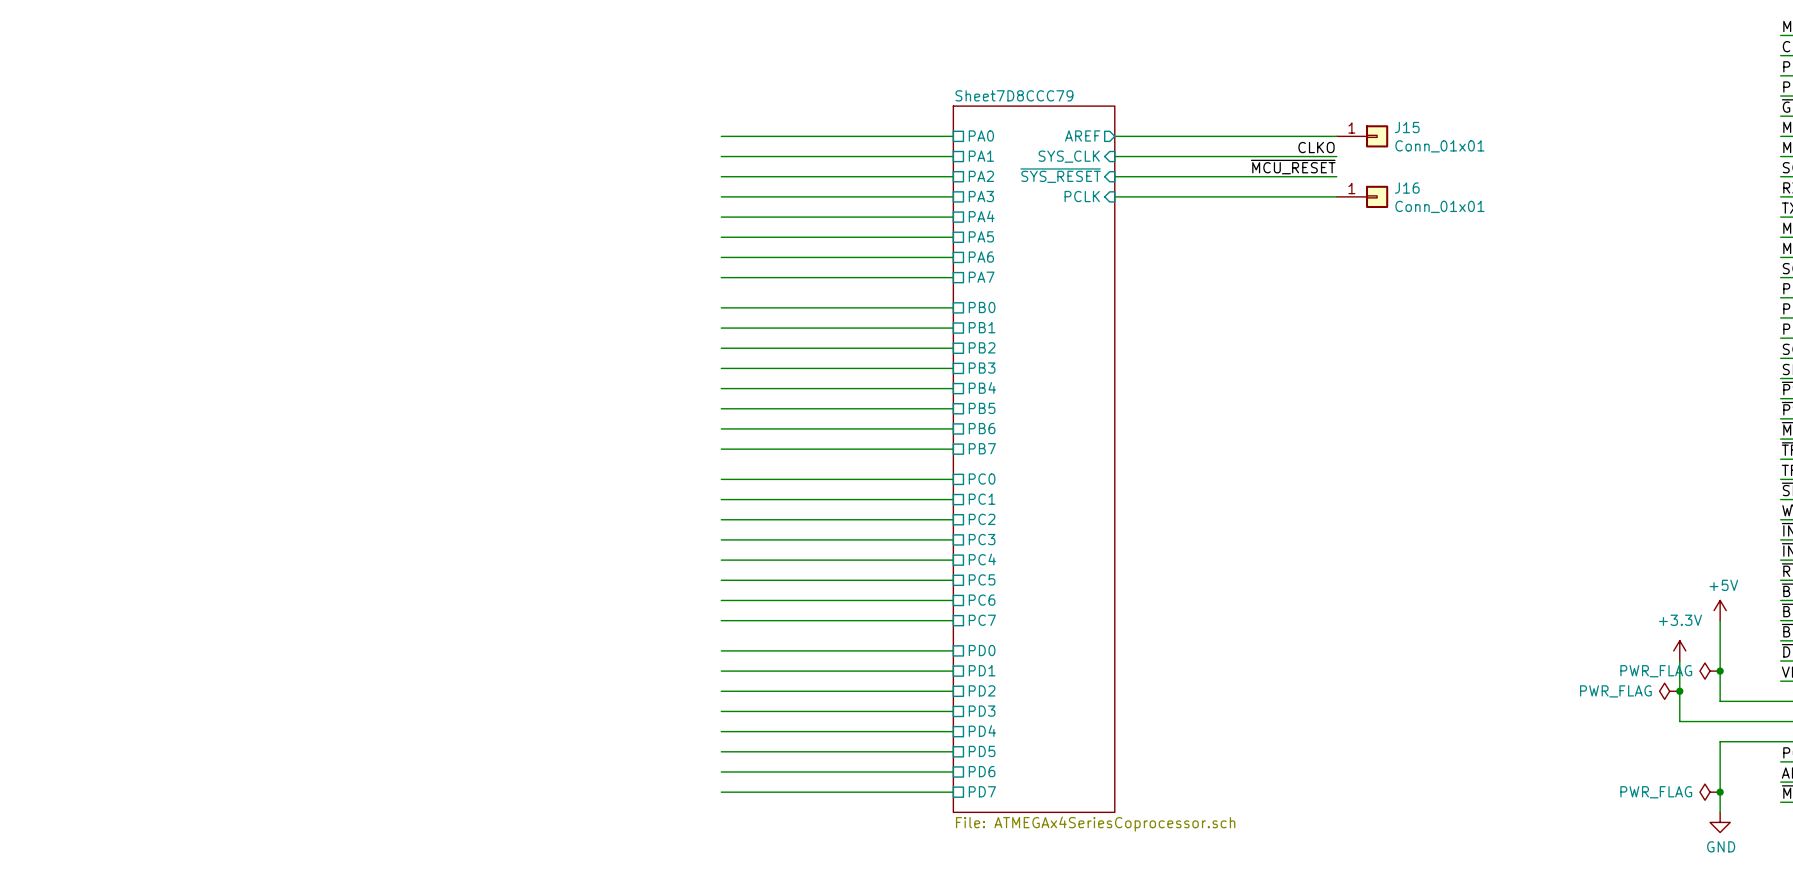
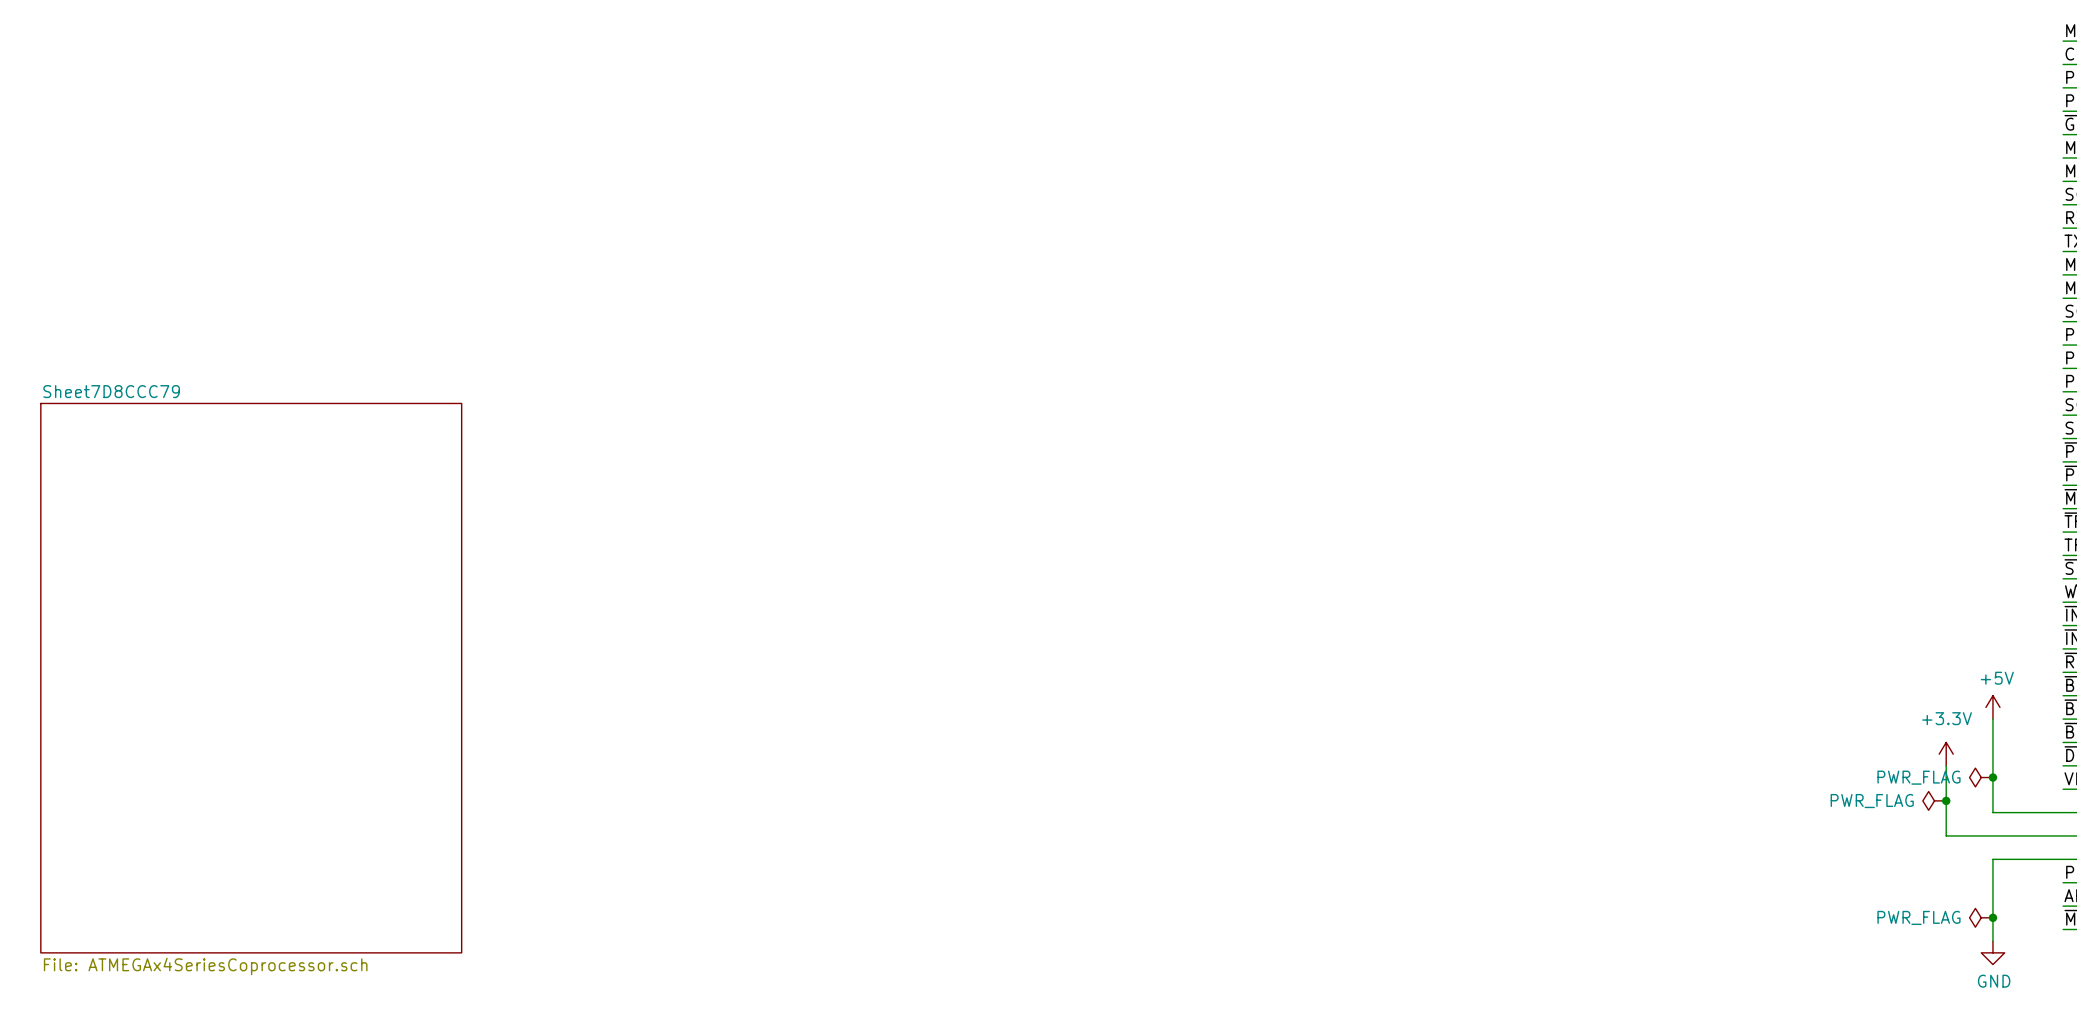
sheet Sheet7D8CCC79 name position: Sheet7D8CCC79 (1014, 95) -> Sheet7D8CCC79 (111, 391)
sheet Sheet7D8CCC79 shape: [953, 106, 1115, 813] -> [40, 403, 462, 953]
sheet pin: PA0 (981, 135) -> none
sheet pin: AREF (1082, 135) -> none
wire: (721, 136) (953, 136) -> none
wire: (1114, 136) (1336, 136) -> none
J15: Conn_01x01 (1362, 136) -> none
label: CLKO (1316, 147) -> none
wire: (721, 156) (953, 156) -> none
sheet pin: PA1 (981, 156) -> none
sheet pin: SYS_CLK (1069, 156) -> none
wire: (1114, 156) (1336, 156) -> none
label: ~{MCU_RESET} (1293, 167) -> none
sheet pin: ~{SYS_RESET} (1060, 175) -> none
wire: (721, 176) (953, 176) -> none
sheet pin: PA2 (981, 176) -> none
wire: (1114, 176) (1336, 176) -> none
wire: (721, 196) (953, 196) -> none
sheet pin: PA3 (981, 196) -> none
sheet pin: PCLK (1082, 196) -> none
wire: (1114, 196) (1336, 196) -> none
J16: Conn_01x01 (1362, 196) -> none
sheet pin: PA4 (981, 216) -> none
wire: (721, 217) (953, 217) -> none
sheet pin: PA5 (981, 236) -> none
wire: (721, 237) (953, 237) -> none
wire: (721, 257) (953, 257) -> none
sheet pin: PA6 (981, 257) -> none
wire: (721, 277) (953, 277) -> none
sheet pin: PA7 (981, 277) -> none
wire: (721, 307) (953, 307) -> none
sheet pin: PB0 (982, 307) -> none
sheet pin: PB1 (982, 327) -> none
wire: (721, 328) (953, 328) -> none
sheet pin: PB2 (982, 347) -> none
wire: (721, 348) (953, 348) -> none
wire: (721, 368) (953, 368) -> none
sheet pin: PB3 (982, 368) -> none
sheet pin: PB4 (982, 387) -> none
wire: (721, 388) (953, 388) -> none
wire: (721, 408) (953, 408) -> none
sheet pin: PB5 (982, 408) -> none
wire: (721, 428) (953, 428) -> none
sheet pin: PB6 (982, 428) -> none
sheet pin: PB7 (982, 448) -> none
wire: (721, 449) (953, 449) -> none
wire: (721, 479) (953, 479) -> none
sheet pin: PC0 (982, 479) -> none
wire: (721, 499) (953, 499) -> none
sheet pin: PC1 (982, 499) -> none
wire: (721, 519) (953, 519) -> none
sheet pin: PC2 (982, 519) -> none
wire: (721, 539) (953, 539) -> none
sheet pin: PC3 (982, 539) -> none
sheet pin: PC4 (982, 559) -> none
wire: (721, 560) (953, 560) -> none
sheet pin: PC5 (982, 579) -> none
wire: (721, 580) (953, 580) -> none
wire: (721, 600) (953, 600) -> none
sheet pin: PC6 (982, 600) -> none
wire: (721, 620) (953, 620) -> none
sheet pin: PC7 (982, 620) -> none
wire: (721, 650) (953, 650) -> none
sheet pin: PD0 (982, 650) -> none
sheet pin: PD1 (982, 670) -> none
wire: (721, 671) (953, 671) -> none
sheet pin: PD2 (982, 690) -> none
wire: (721, 691) (953, 691) -> none
wire: (721, 711) (953, 711) -> none
sheet pin: PD3 (982, 711) -> none
wire: (721, 731) (953, 731) -> none
sheet pin: PD4 (982, 731) -> none
wire: (721, 751) (953, 751) -> none
sheet pin: PD5 (982, 751) -> none
wire: (721, 771) (953, 771) -> none
sheet pin: PD6 (982, 771) -> none
sheet pin: PD7 (982, 791) -> none
wire: (721, 792) (953, 792) -> none
sheet Sheet7D8CCC79 value position: File: ATMEGAx4SeriesCoprocessor.sch (1095, 824) -> File: ATMEGAx4SeriesCoprocessor.sch (205, 966)

